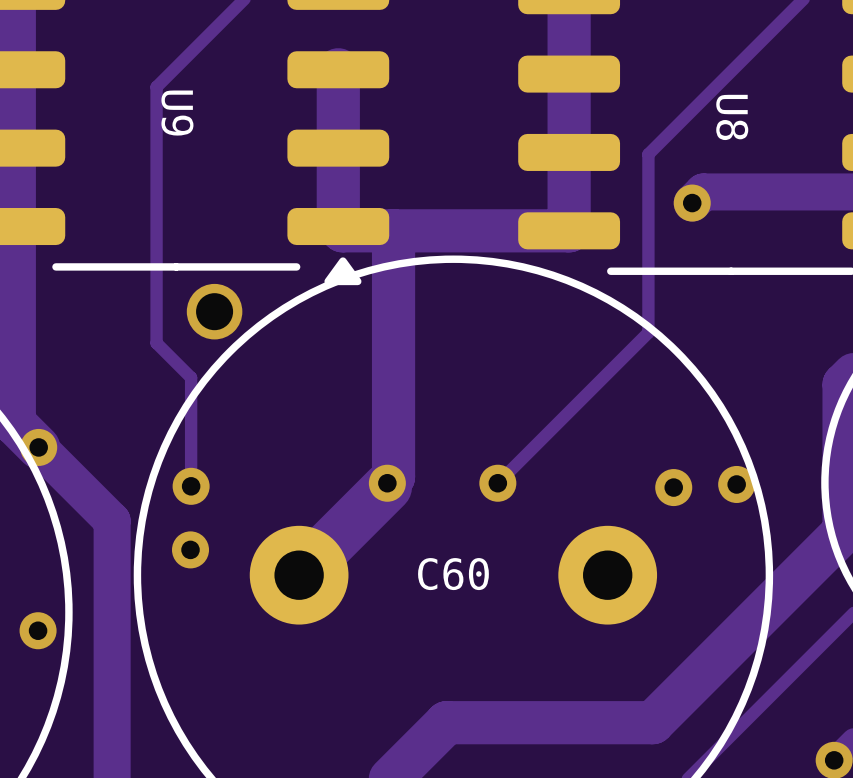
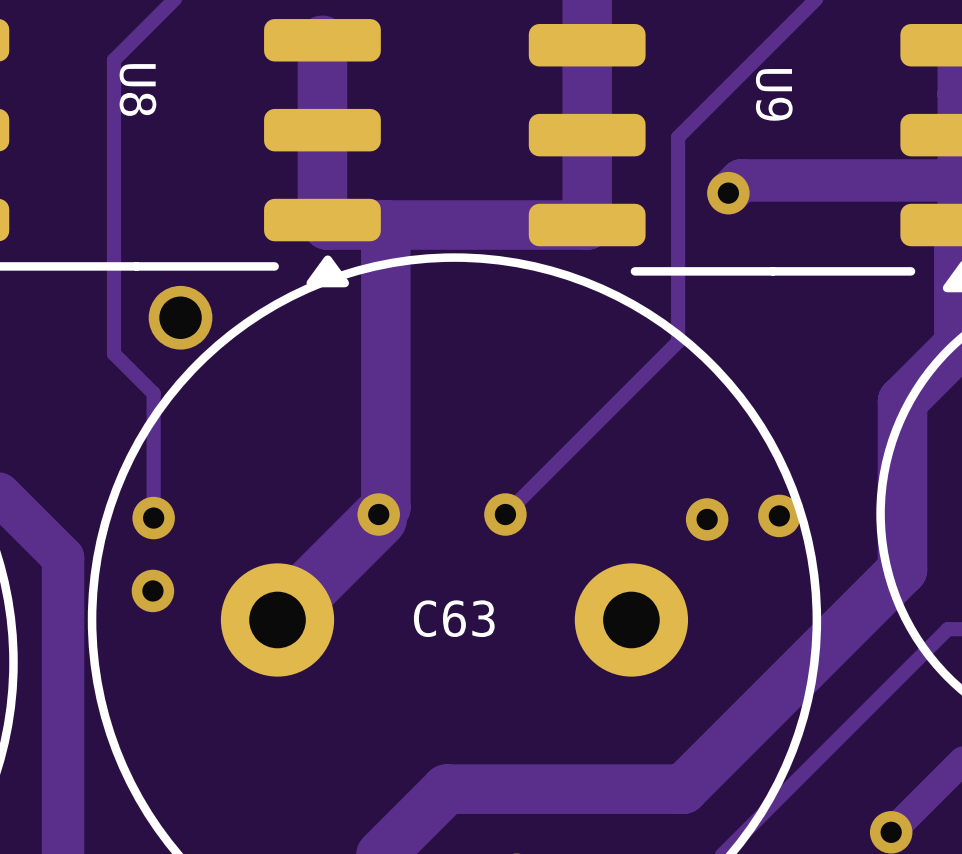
U9 name: U9 (177, 113) -> U8 (137, 90)
U8 name: U8 (732, 117) -> U9 (774, 94)
C60 name: C60 (453, 574) -> C63 (454, 618)

